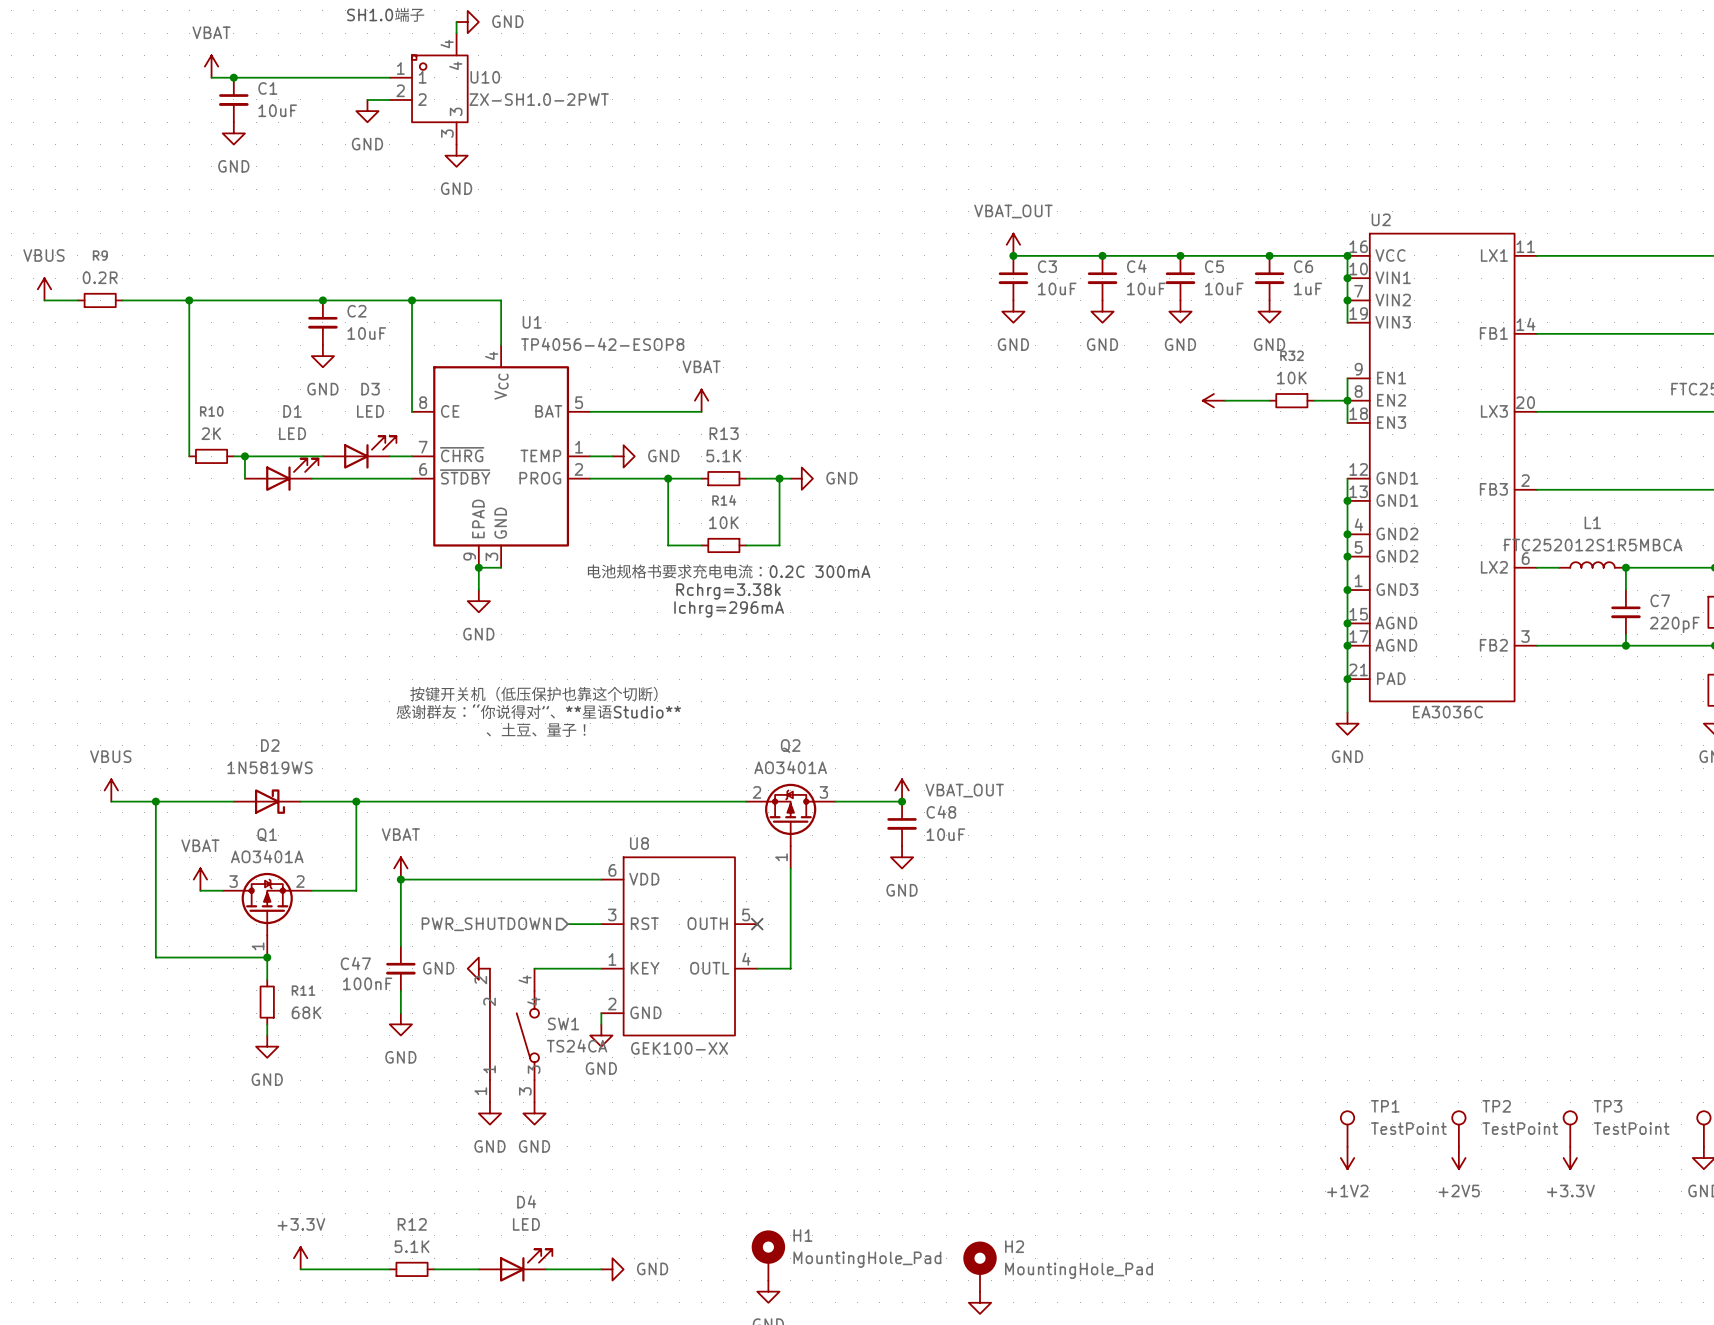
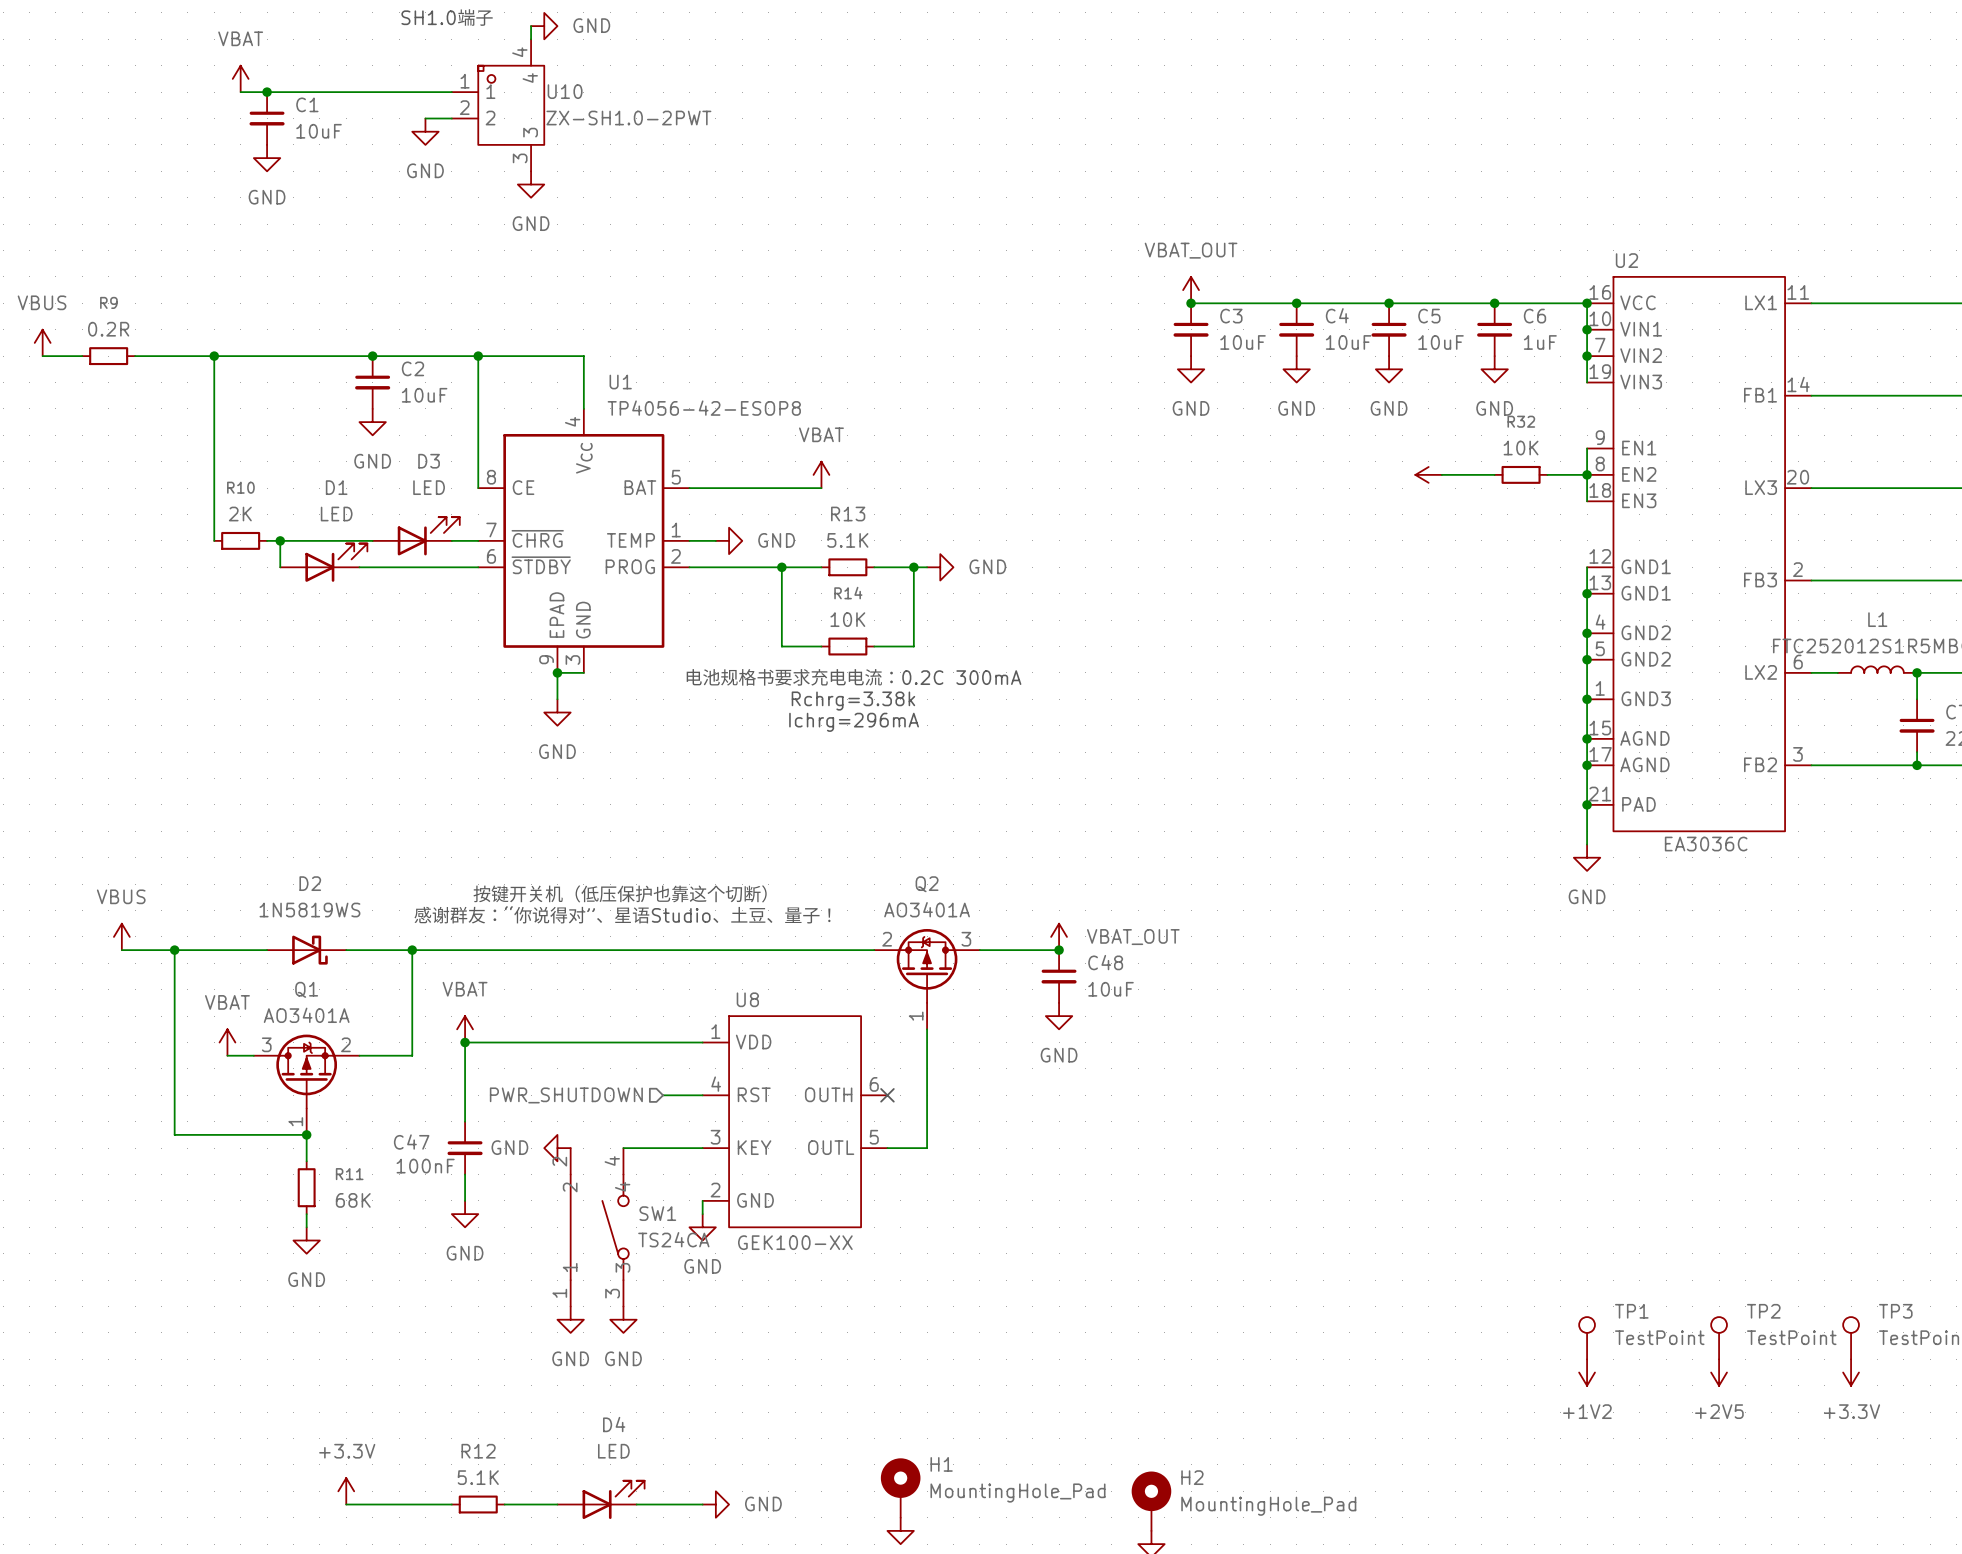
text position: 按键开关机（低压保护也靠这个切断） (533, 694) -> 按键开关机（低压保护也靠这个切断） (620, 893)
text: 感谢群友：“你说得对”、**星语Studio** (538, 711) -> none
text: 、土豆、量子！ (536, 729) -> none
text: none -> 感谢群友：“你说得对”、星语Studio、土豆、量子！ (622, 915)
U8 pin number: 6 (612, 870) -> 1 (715, 1031)
U8 pin number: 3 (612, 914) -> 4 (716, 1084)
U8 pin number: 5 (746, 914) -> 6 (874, 1084)
U8 pin number: 1 (612, 959) -> 3 (715, 1137)
U8 pin number: 4 (746, 959) -> 5 (874, 1137)

